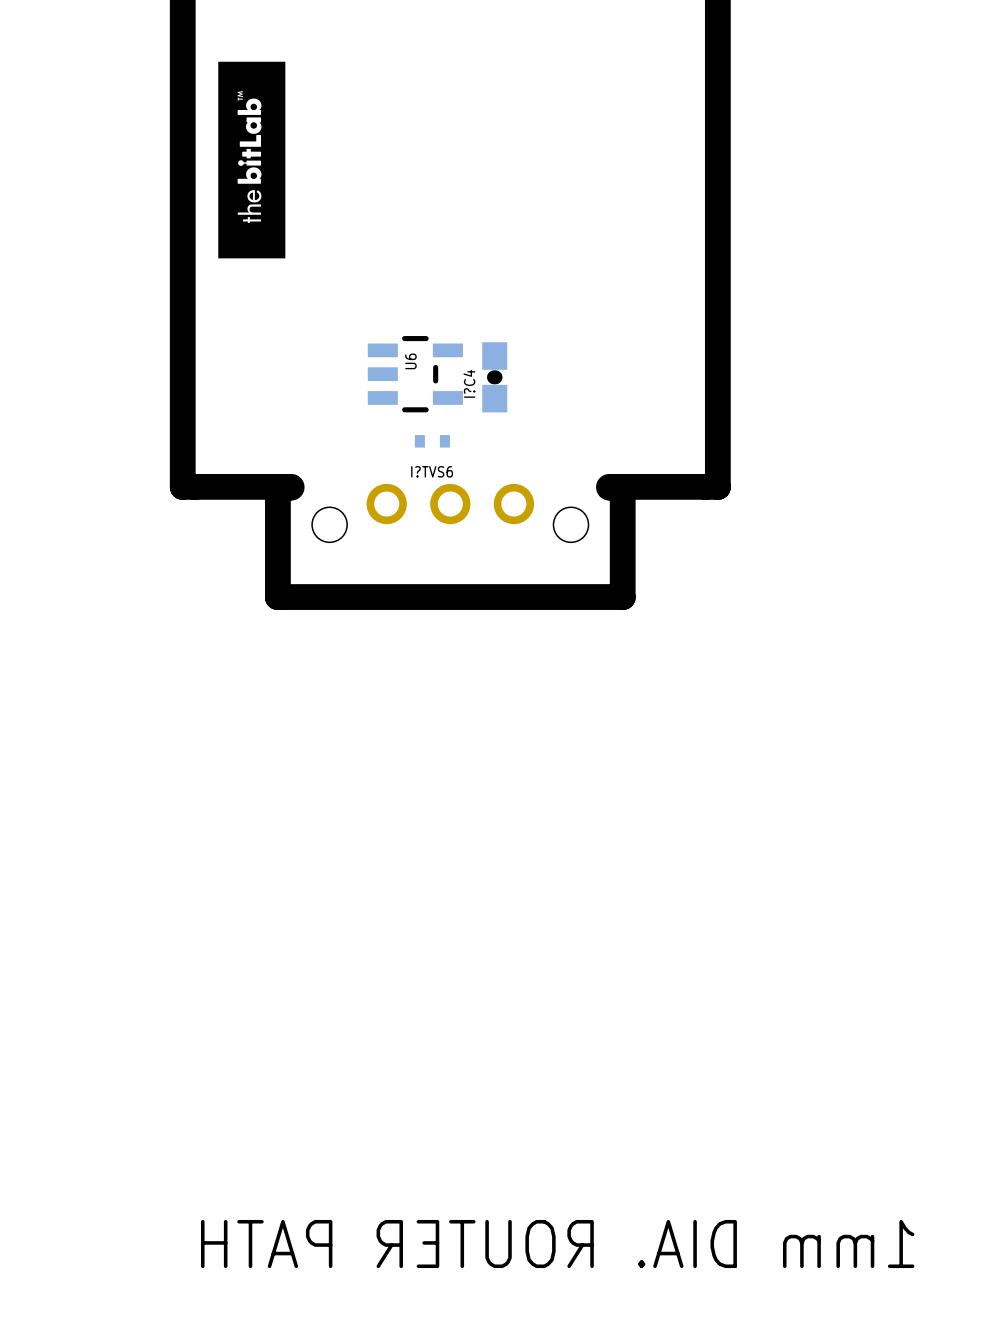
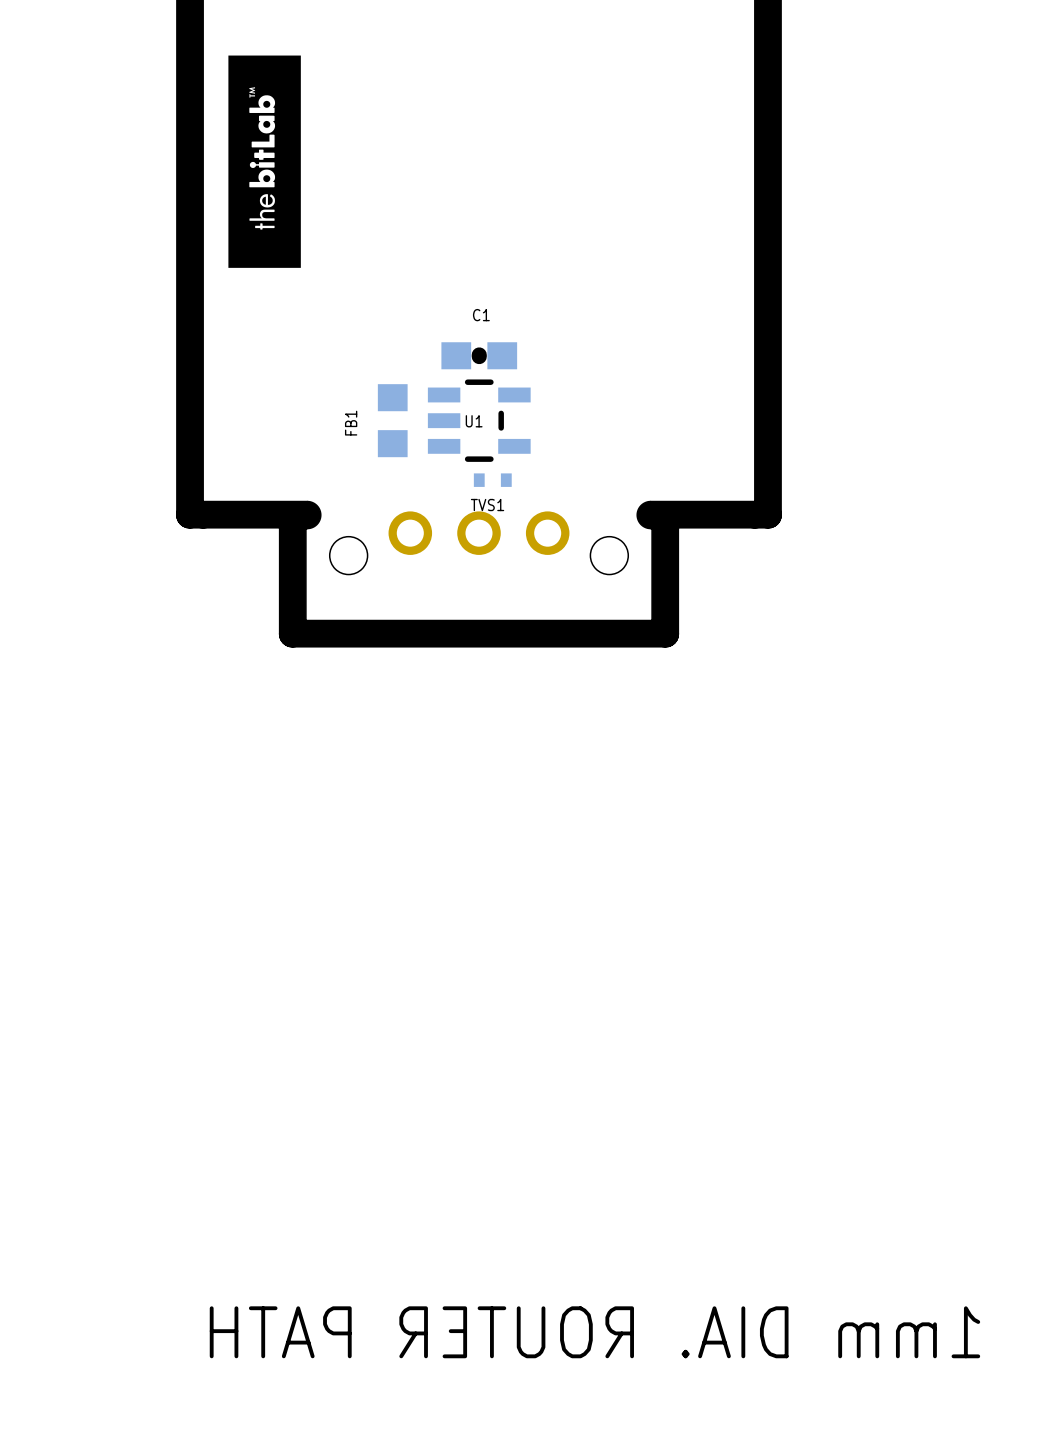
C1: none -> (479, 355)
U6: (415, 374) -> none
I?C4: (494, 377) -> none
FB1: none -> (392, 420)
U1: none -> (479, 420)
I?TVS6: (432, 441) -> none
TVS1: none -> (492, 480)

